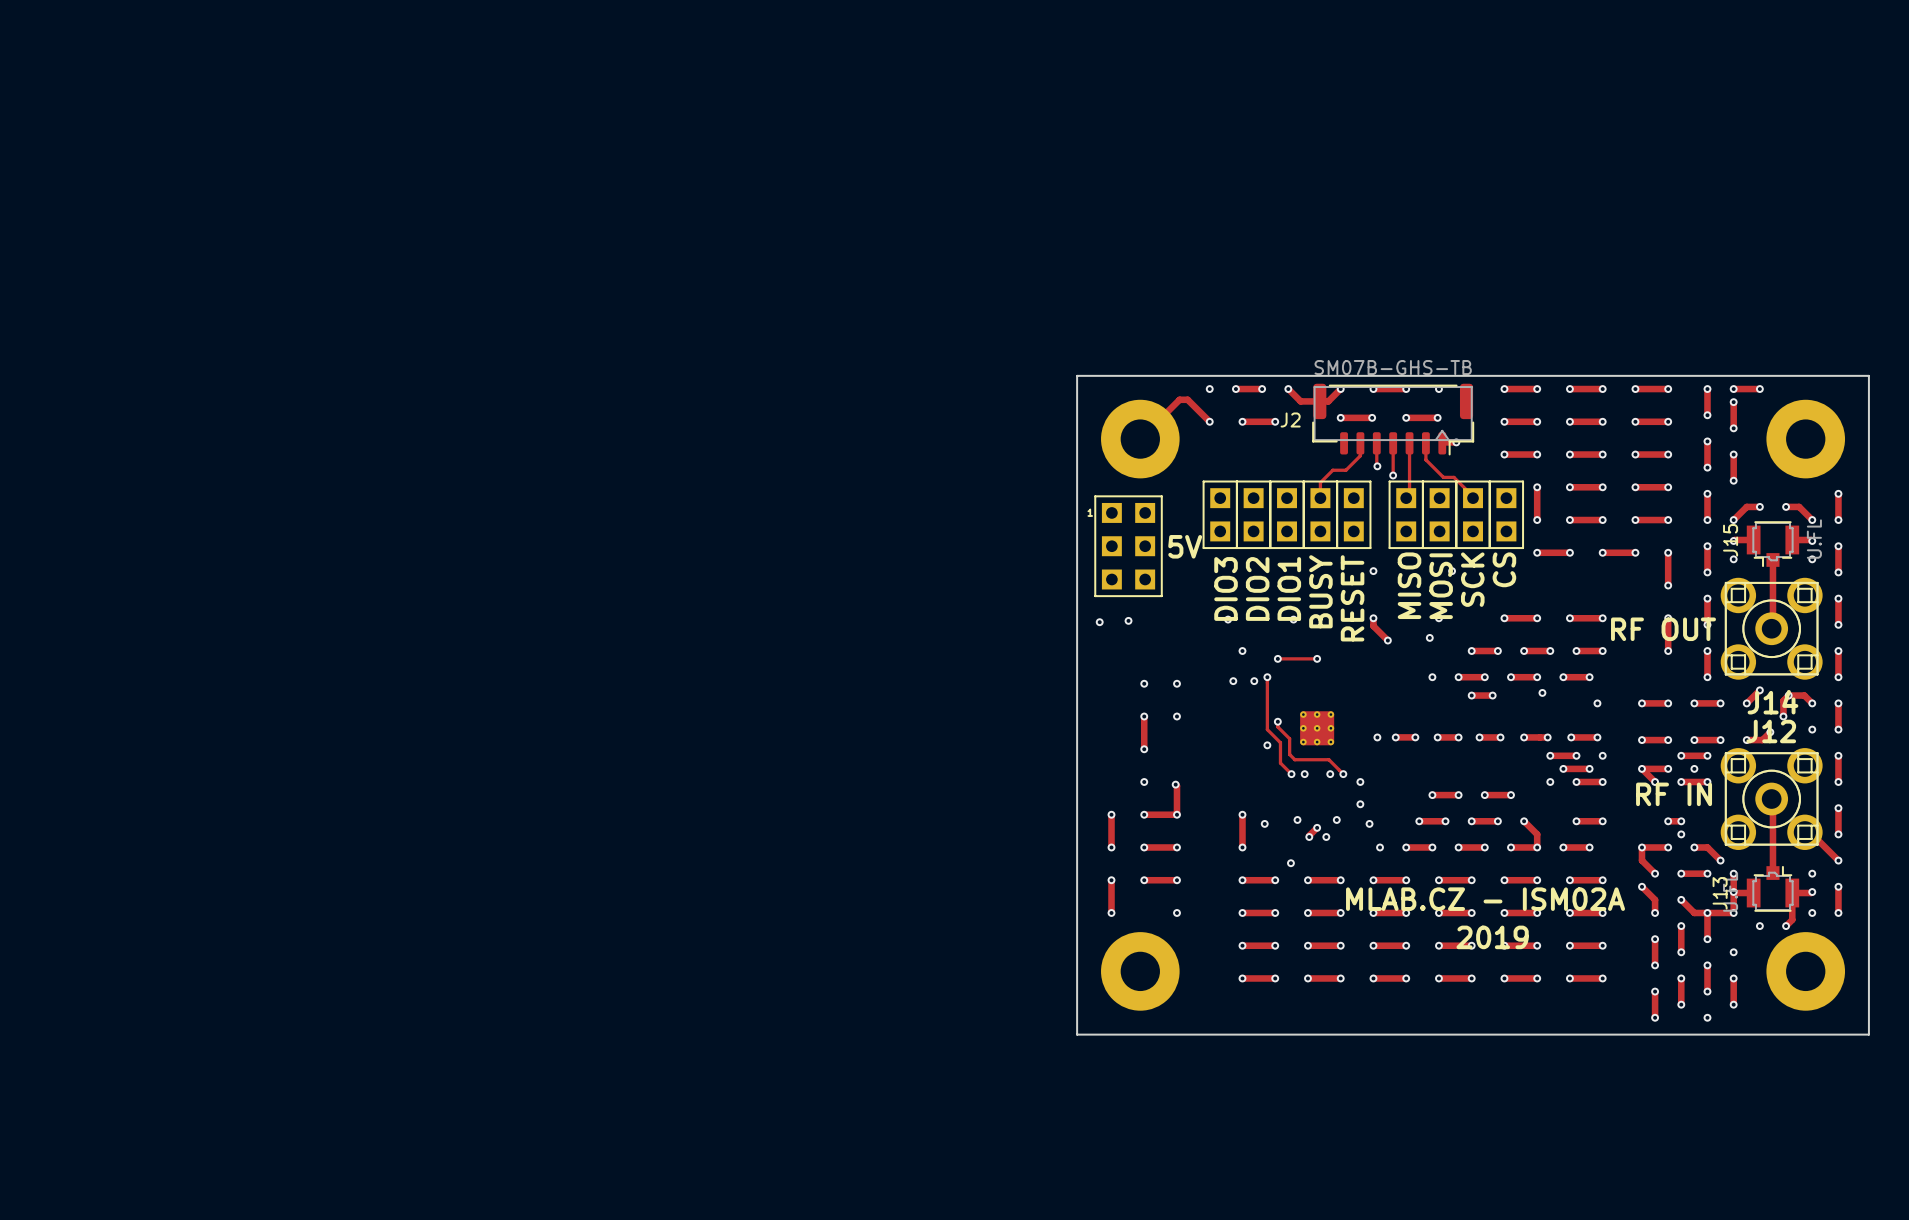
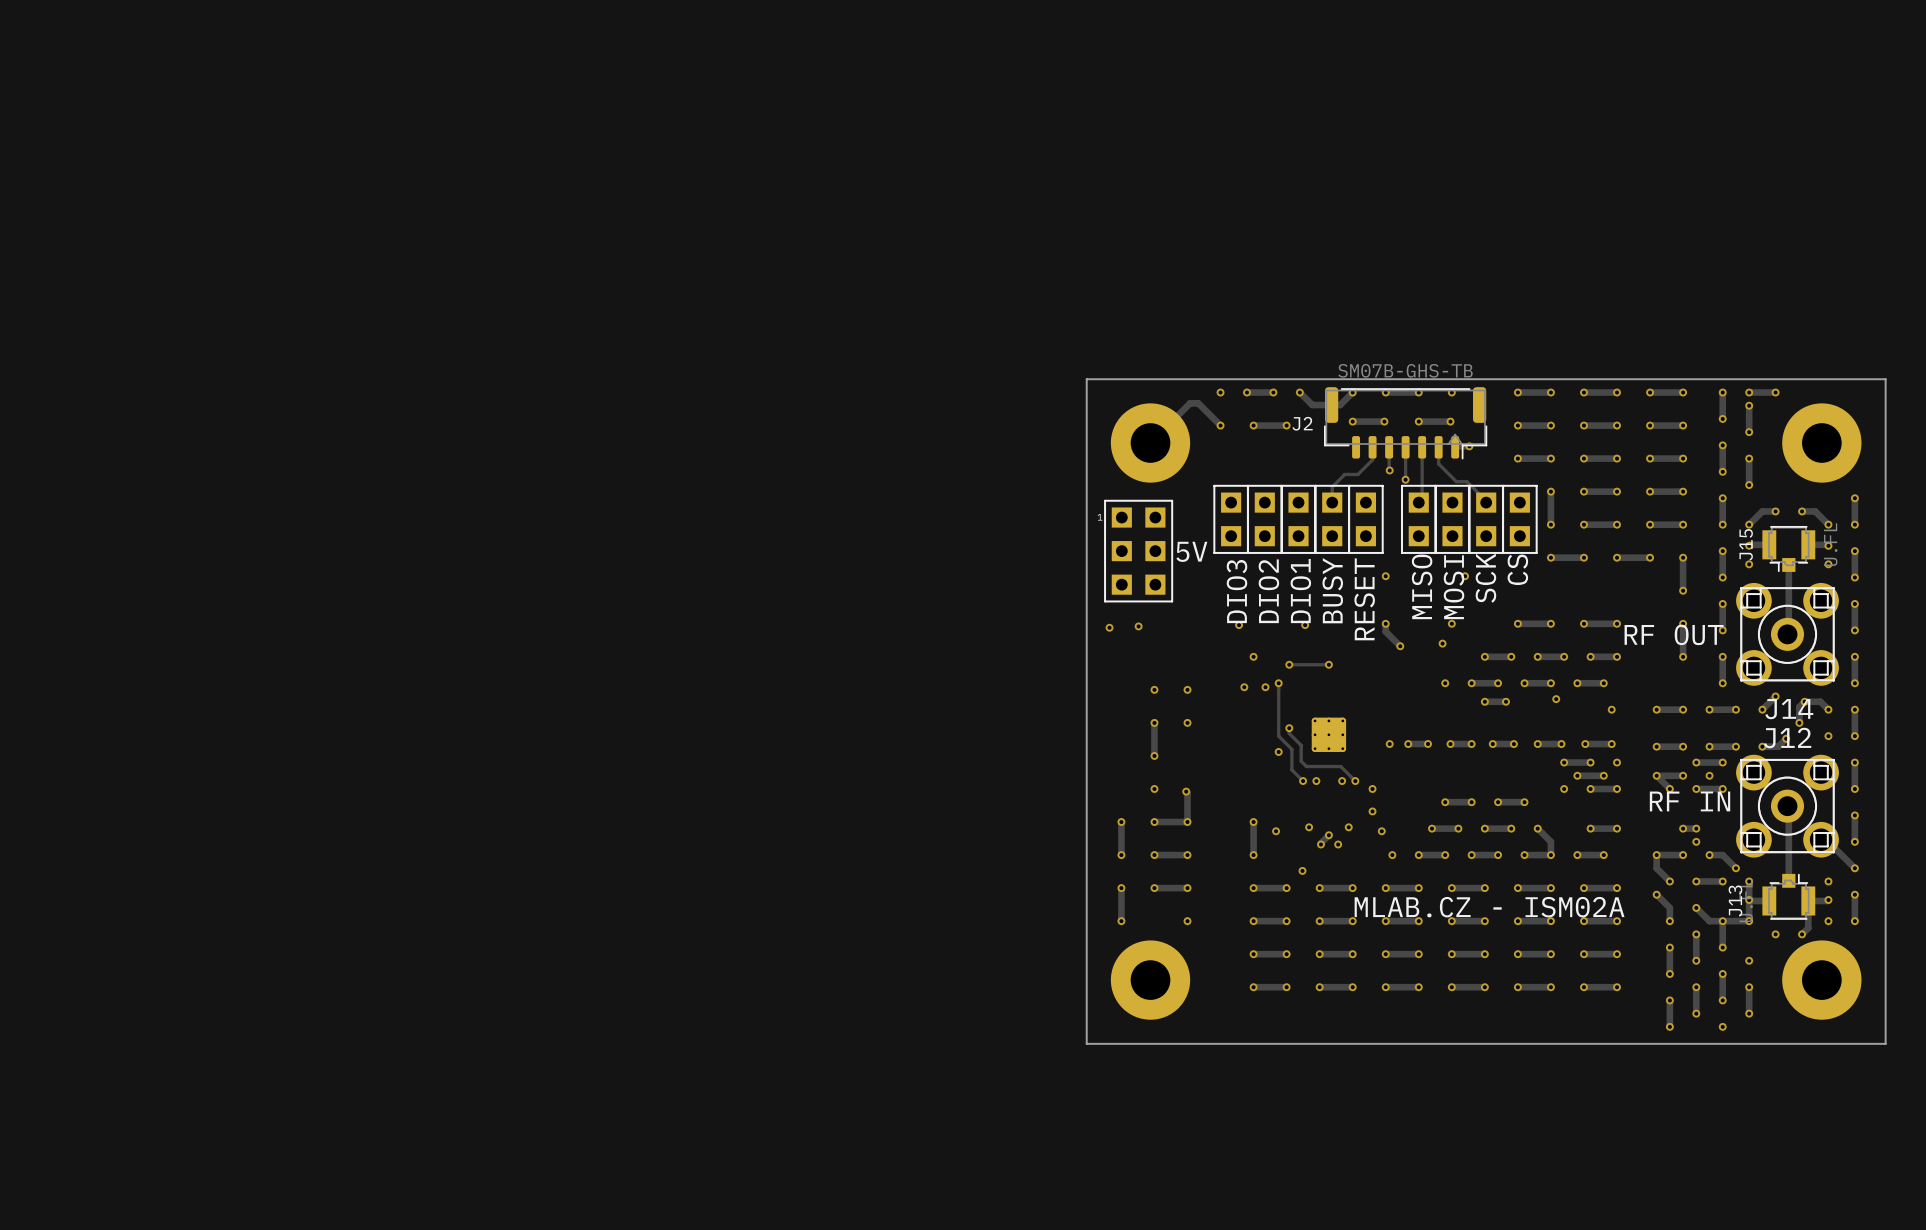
text: 2019 (1492, 937) -> none

